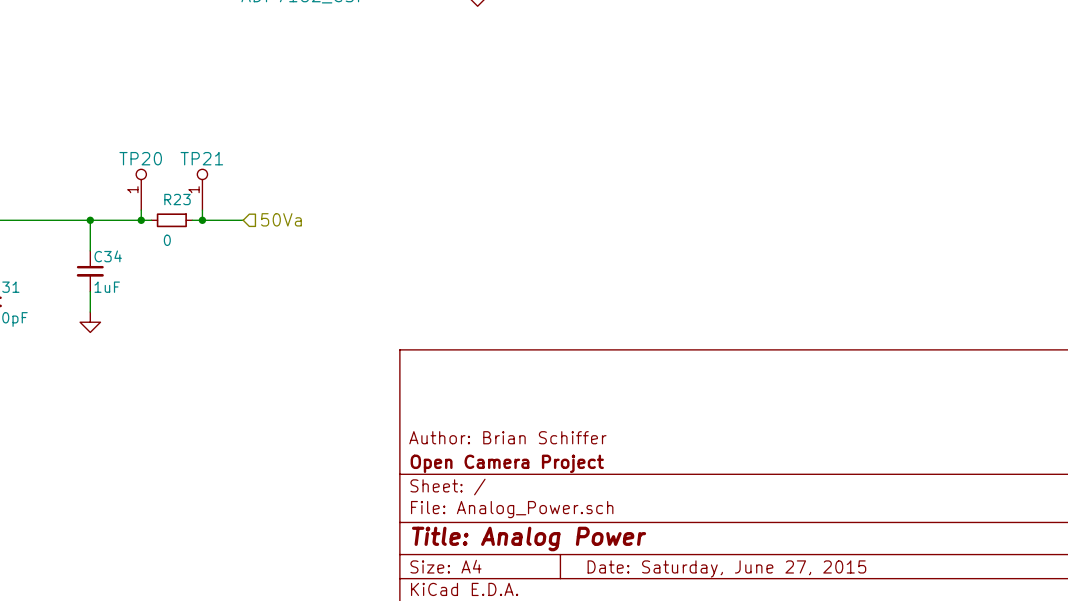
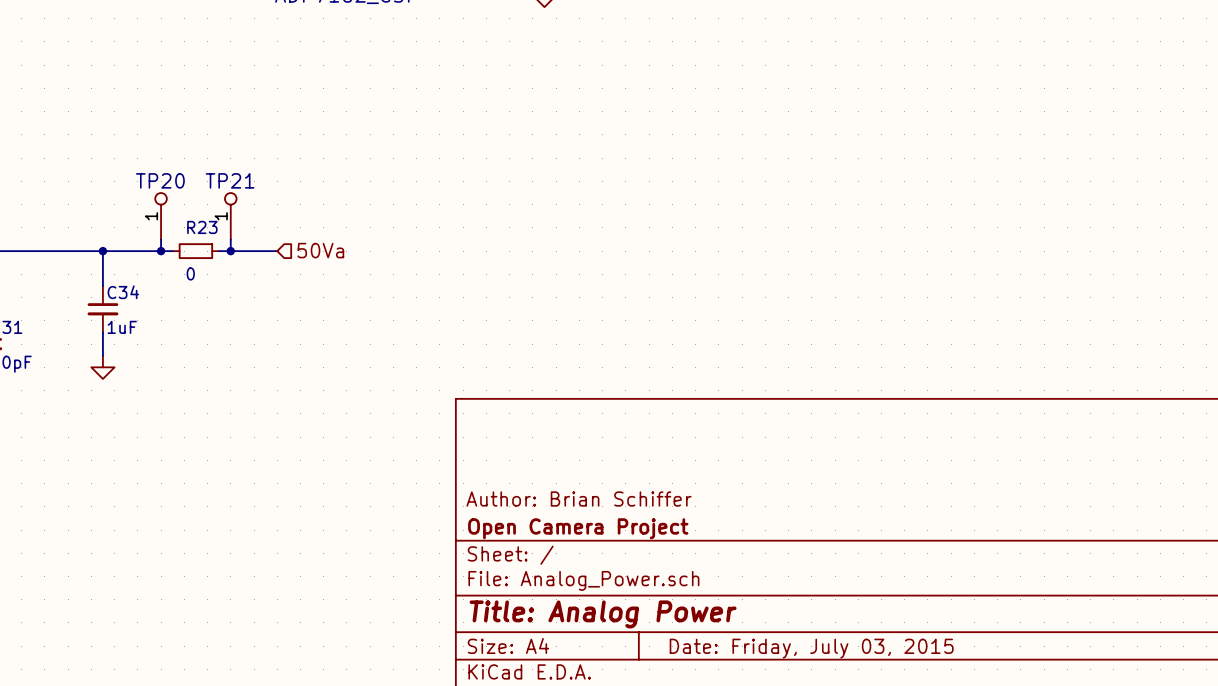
title block: Date: Saturday, June 27, 2015 (726, 568) -> Date: Friday, July 03, 2015 (811, 648)

